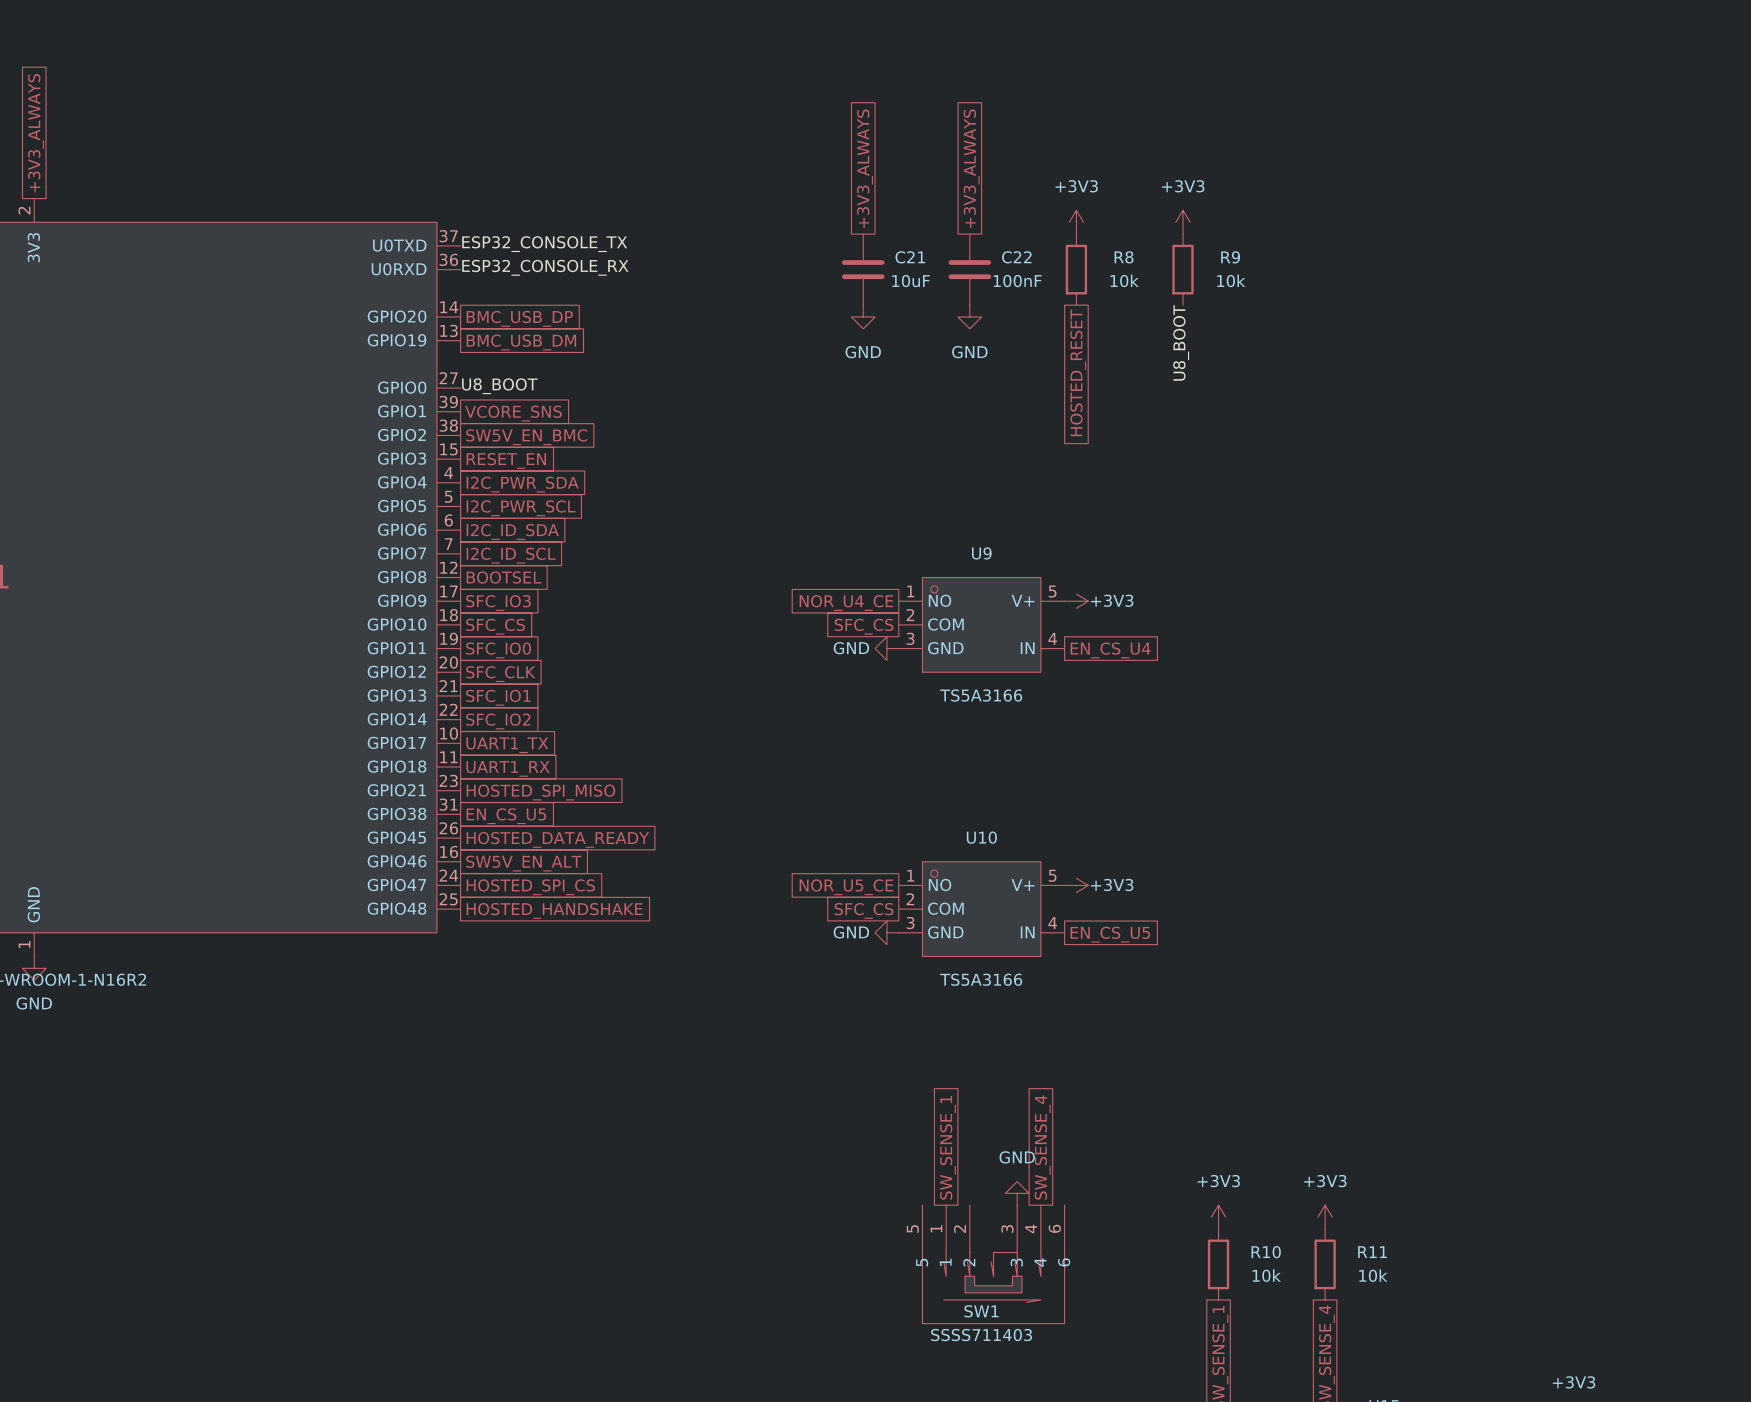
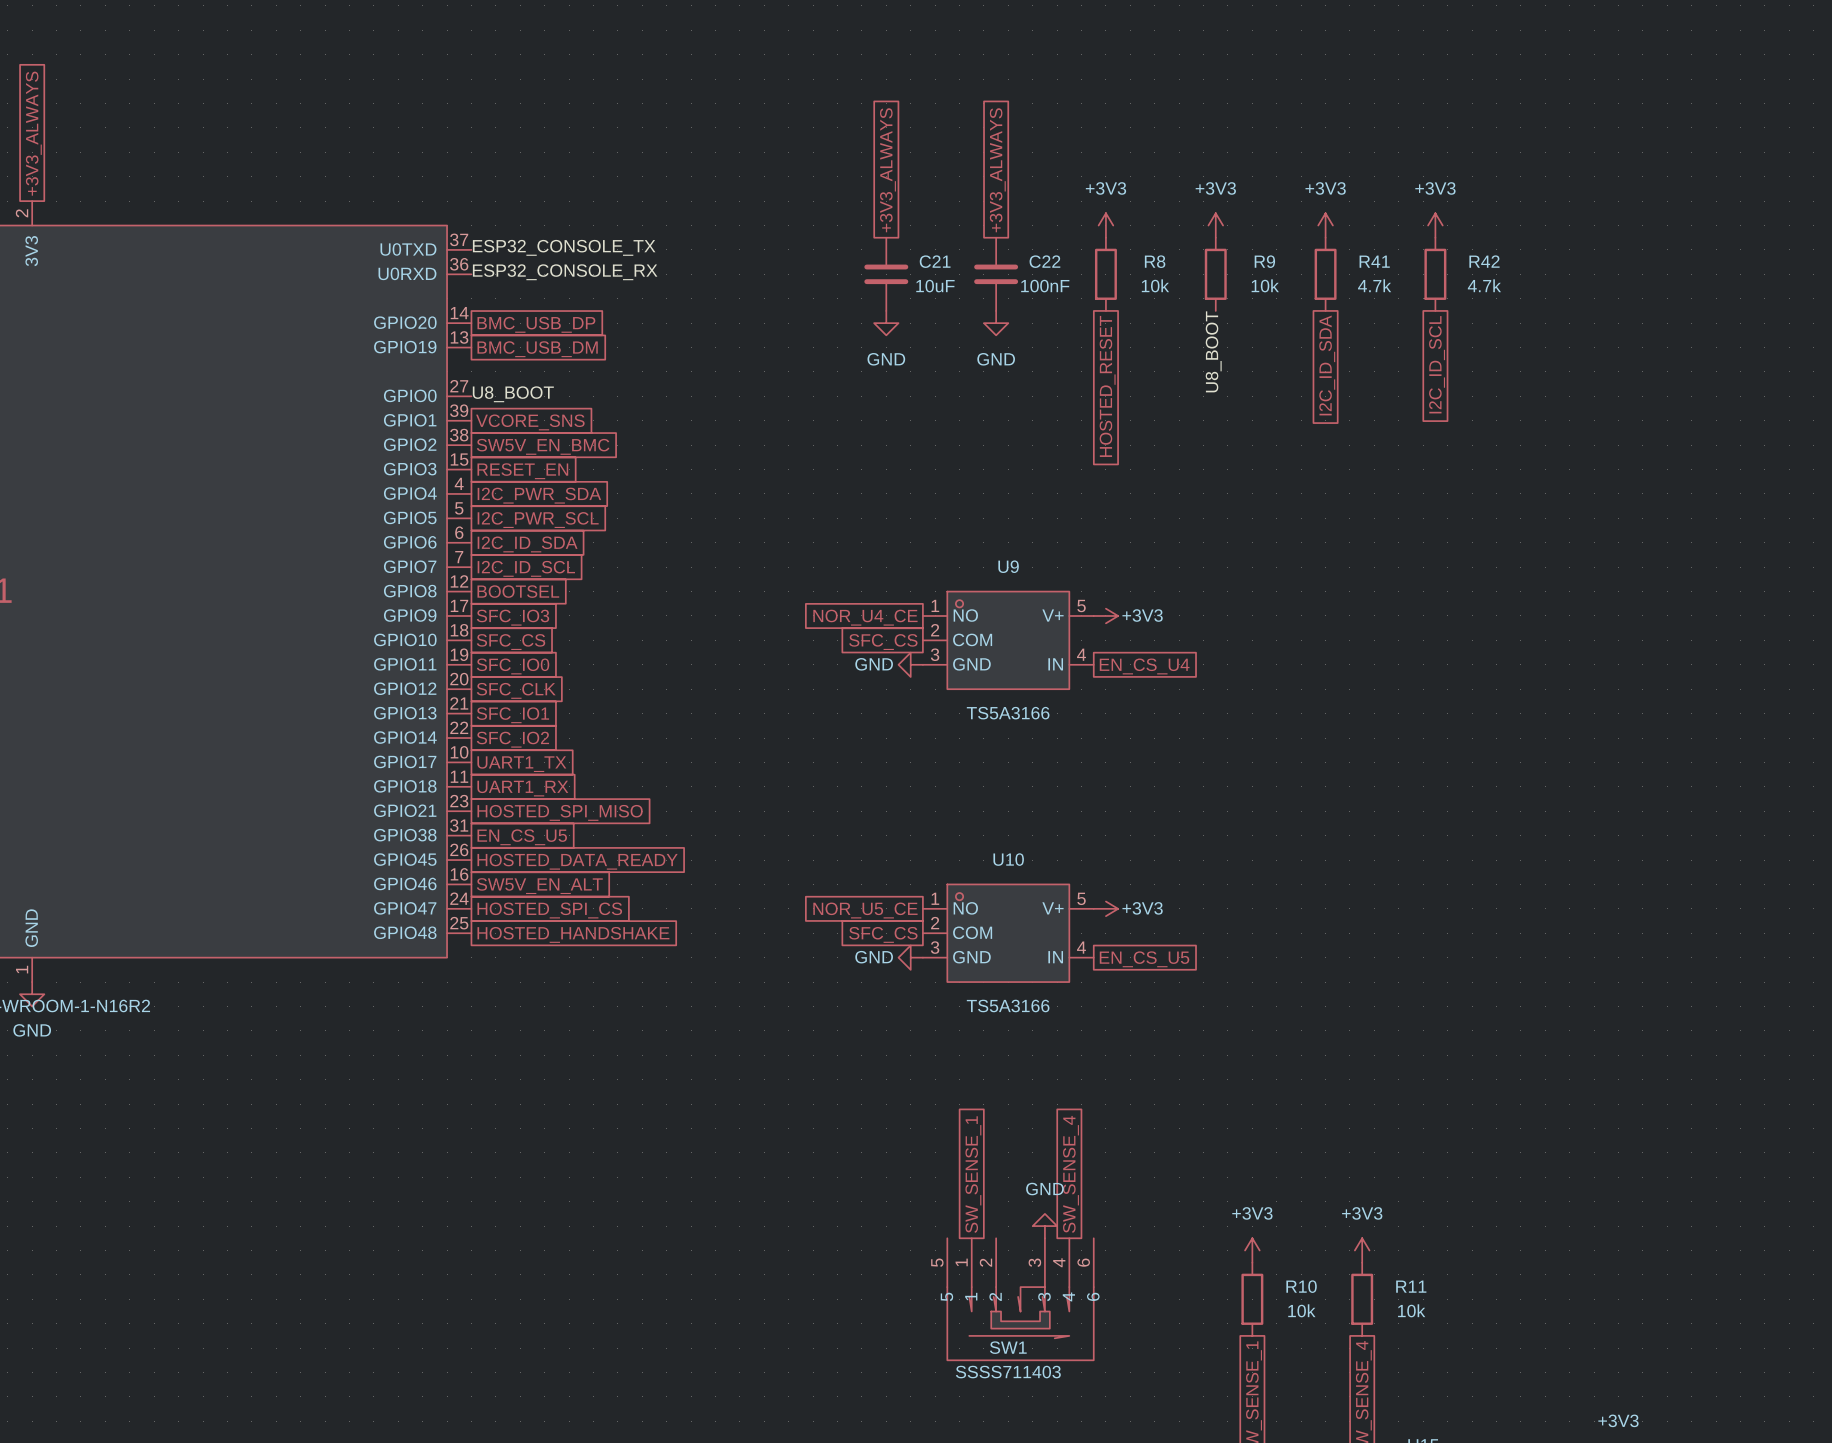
power symbol: none -> +3V3 (1325, 225)
power symbol: none -> +3V3 (1435, 225)
R41: none -> 4.7k (1325, 274)
R42: none -> 4.7k (1435, 274)
global label: none -> I2C_ID_SCL (1437, 364)
global label: none -> I2C_ID_SDA (1327, 365)

